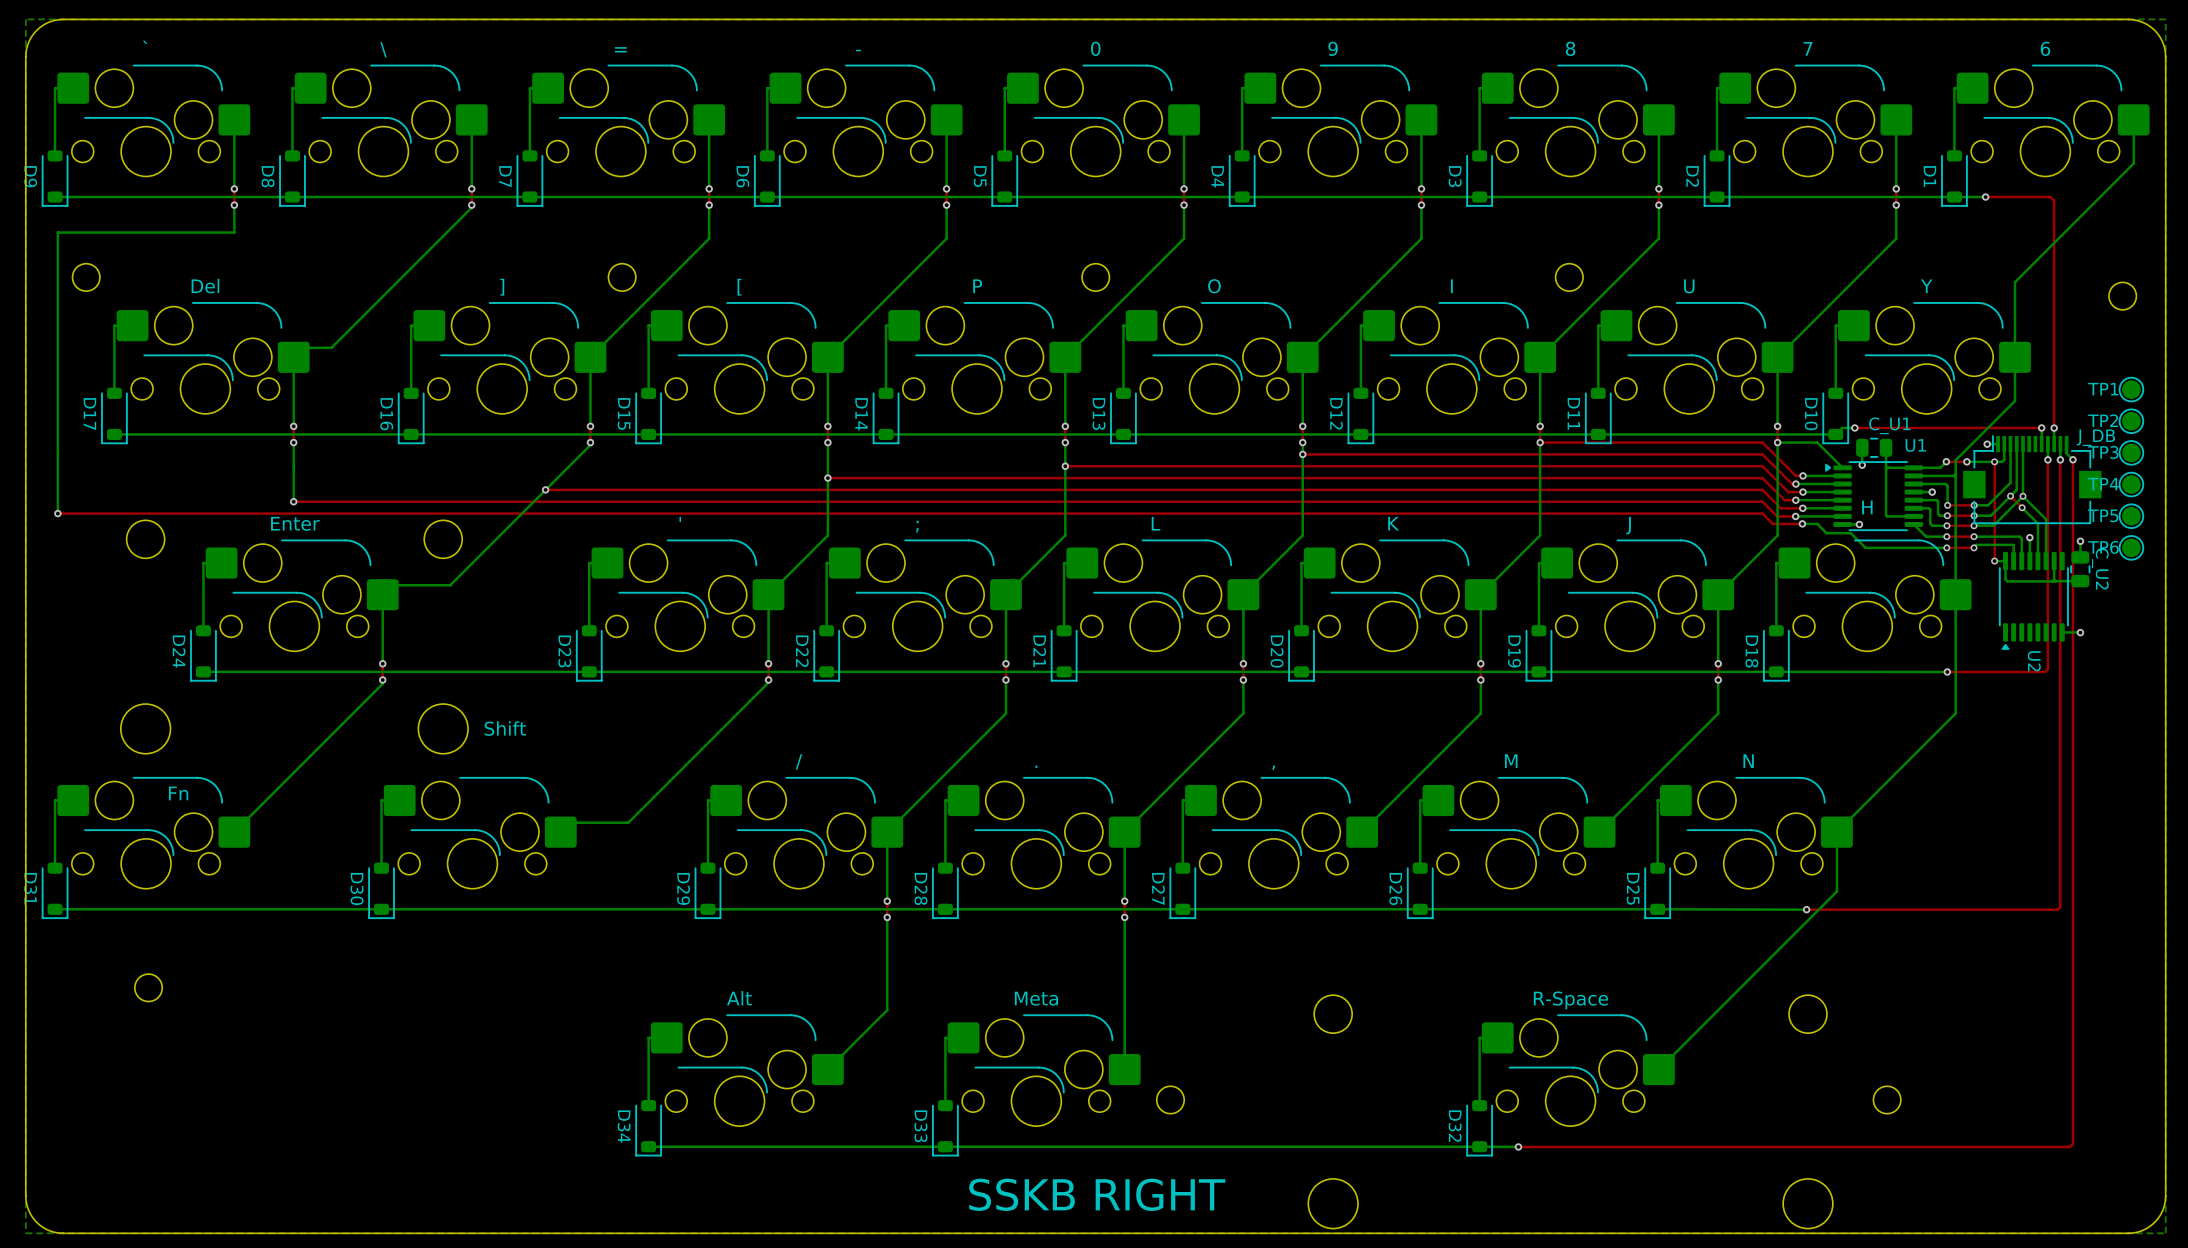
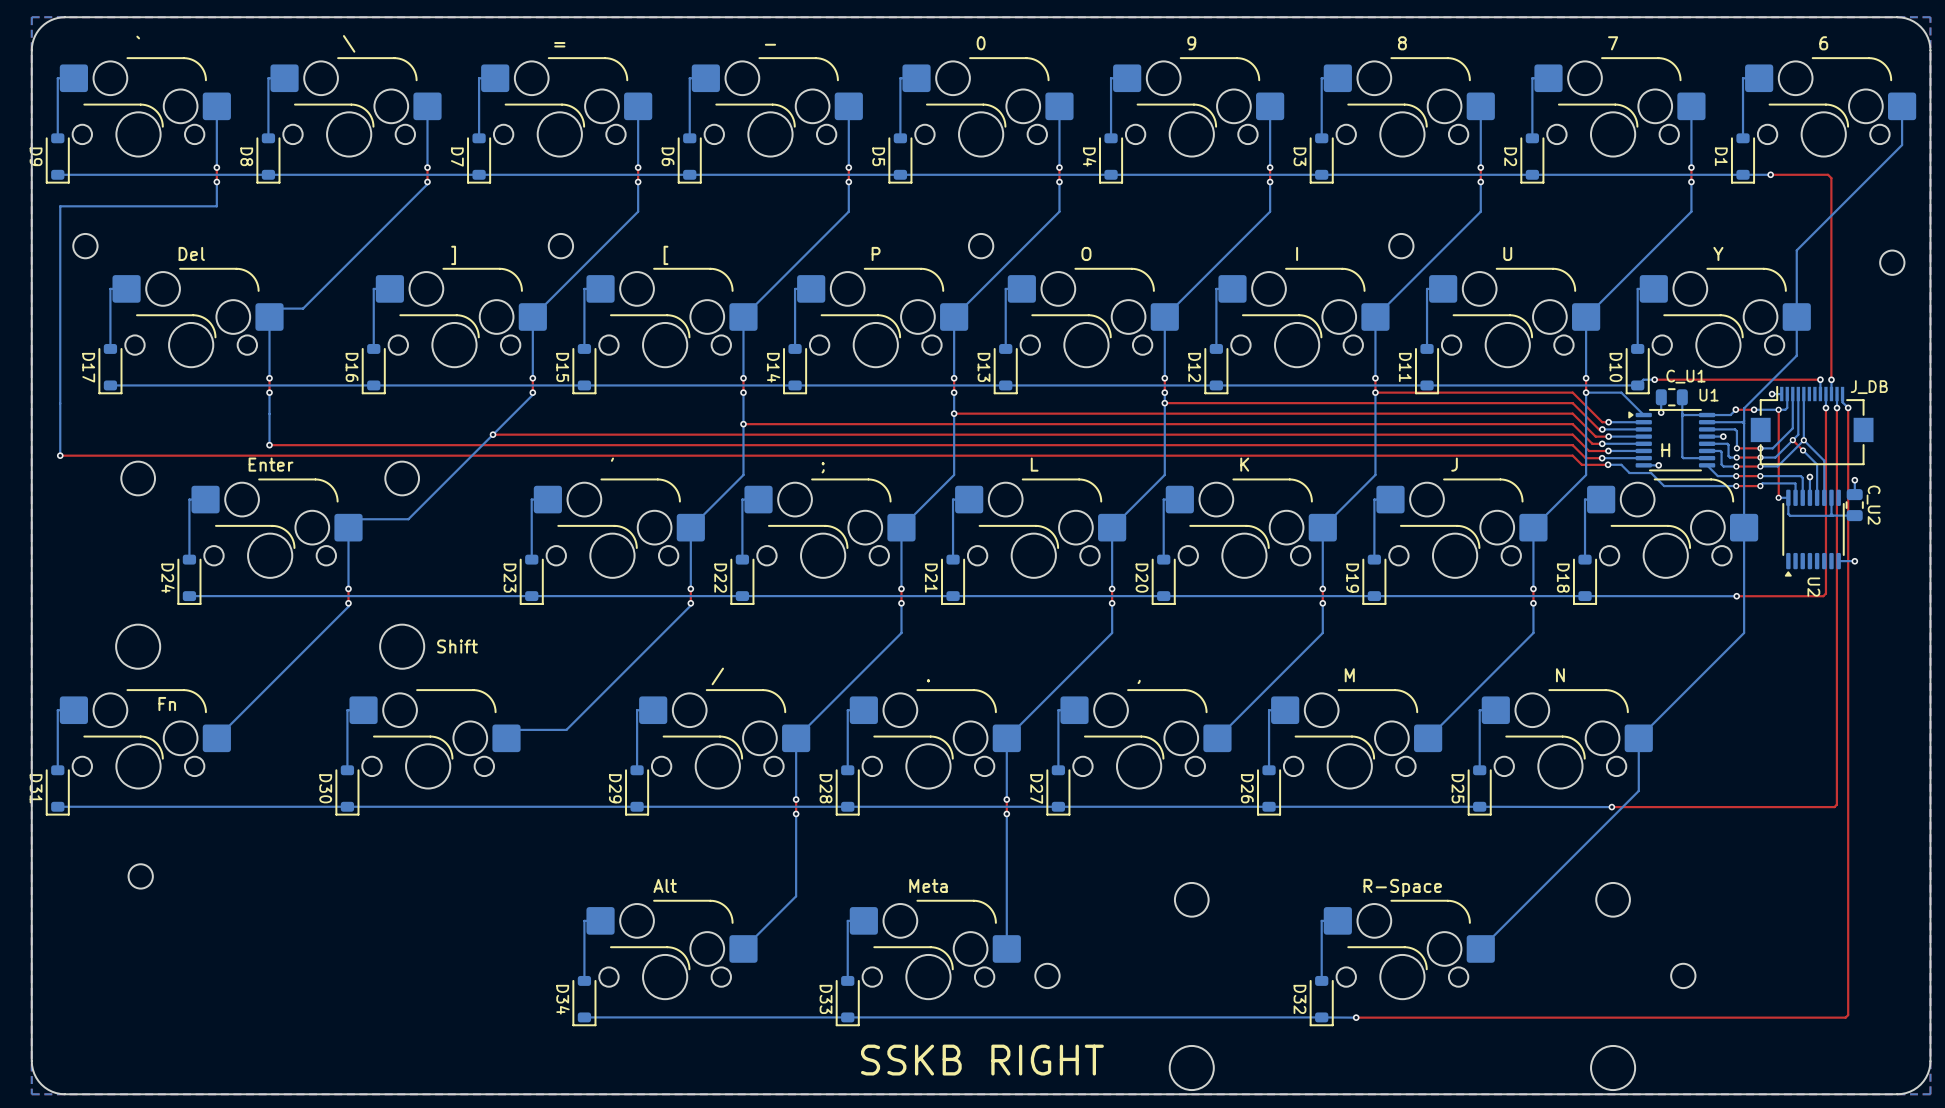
TP1: (2131, 389) -> none
TP2: (2131, 421) -> none
TP3: (2131, 452) -> none
TP4: (2131, 484) -> none
TP5: (2131, 516) -> none
TP6: (2131, 547) -> none

